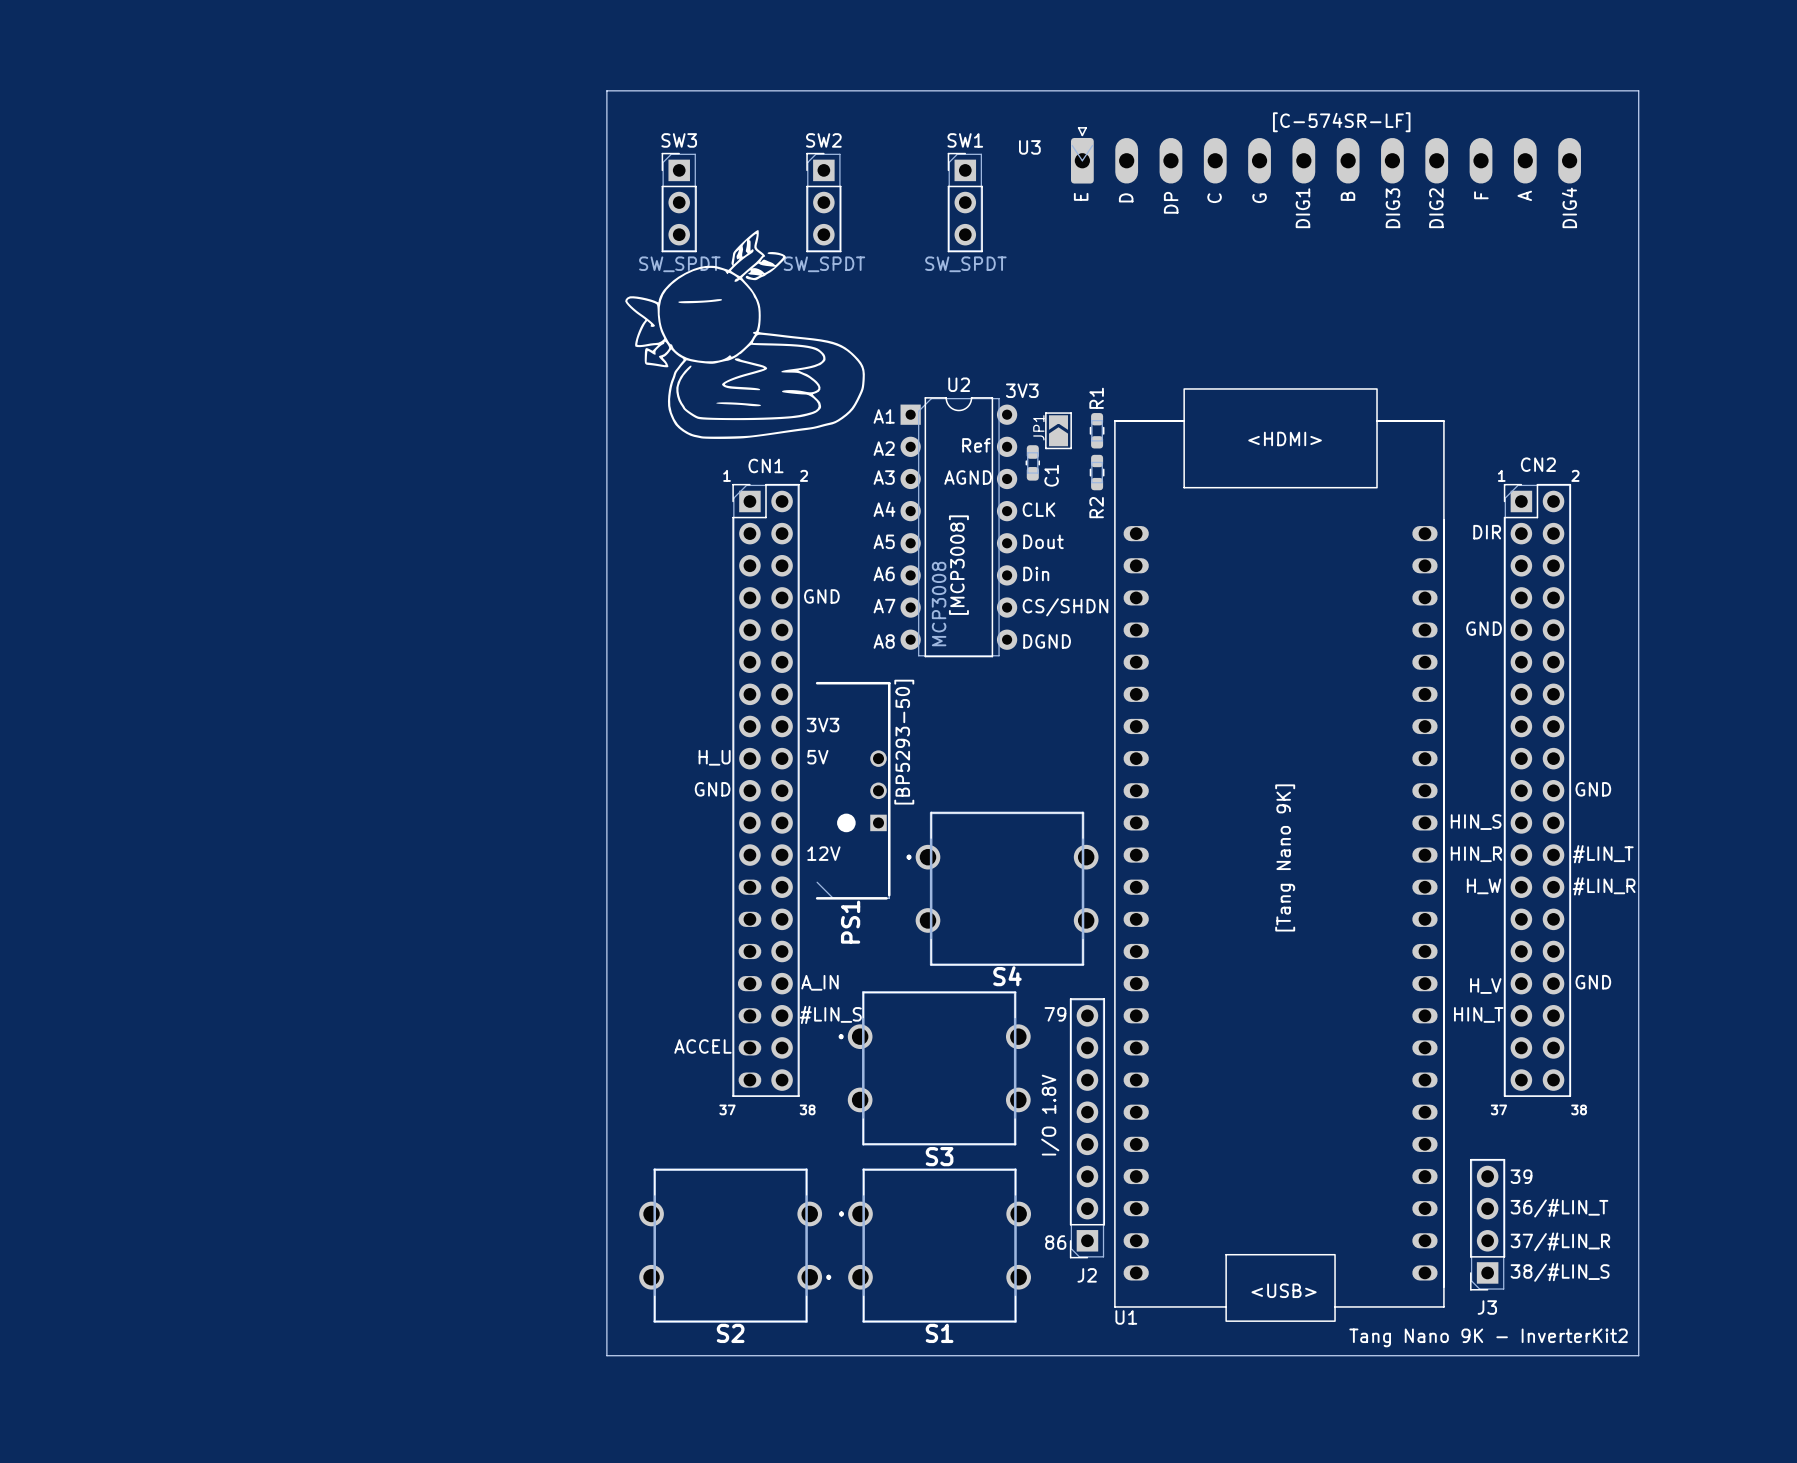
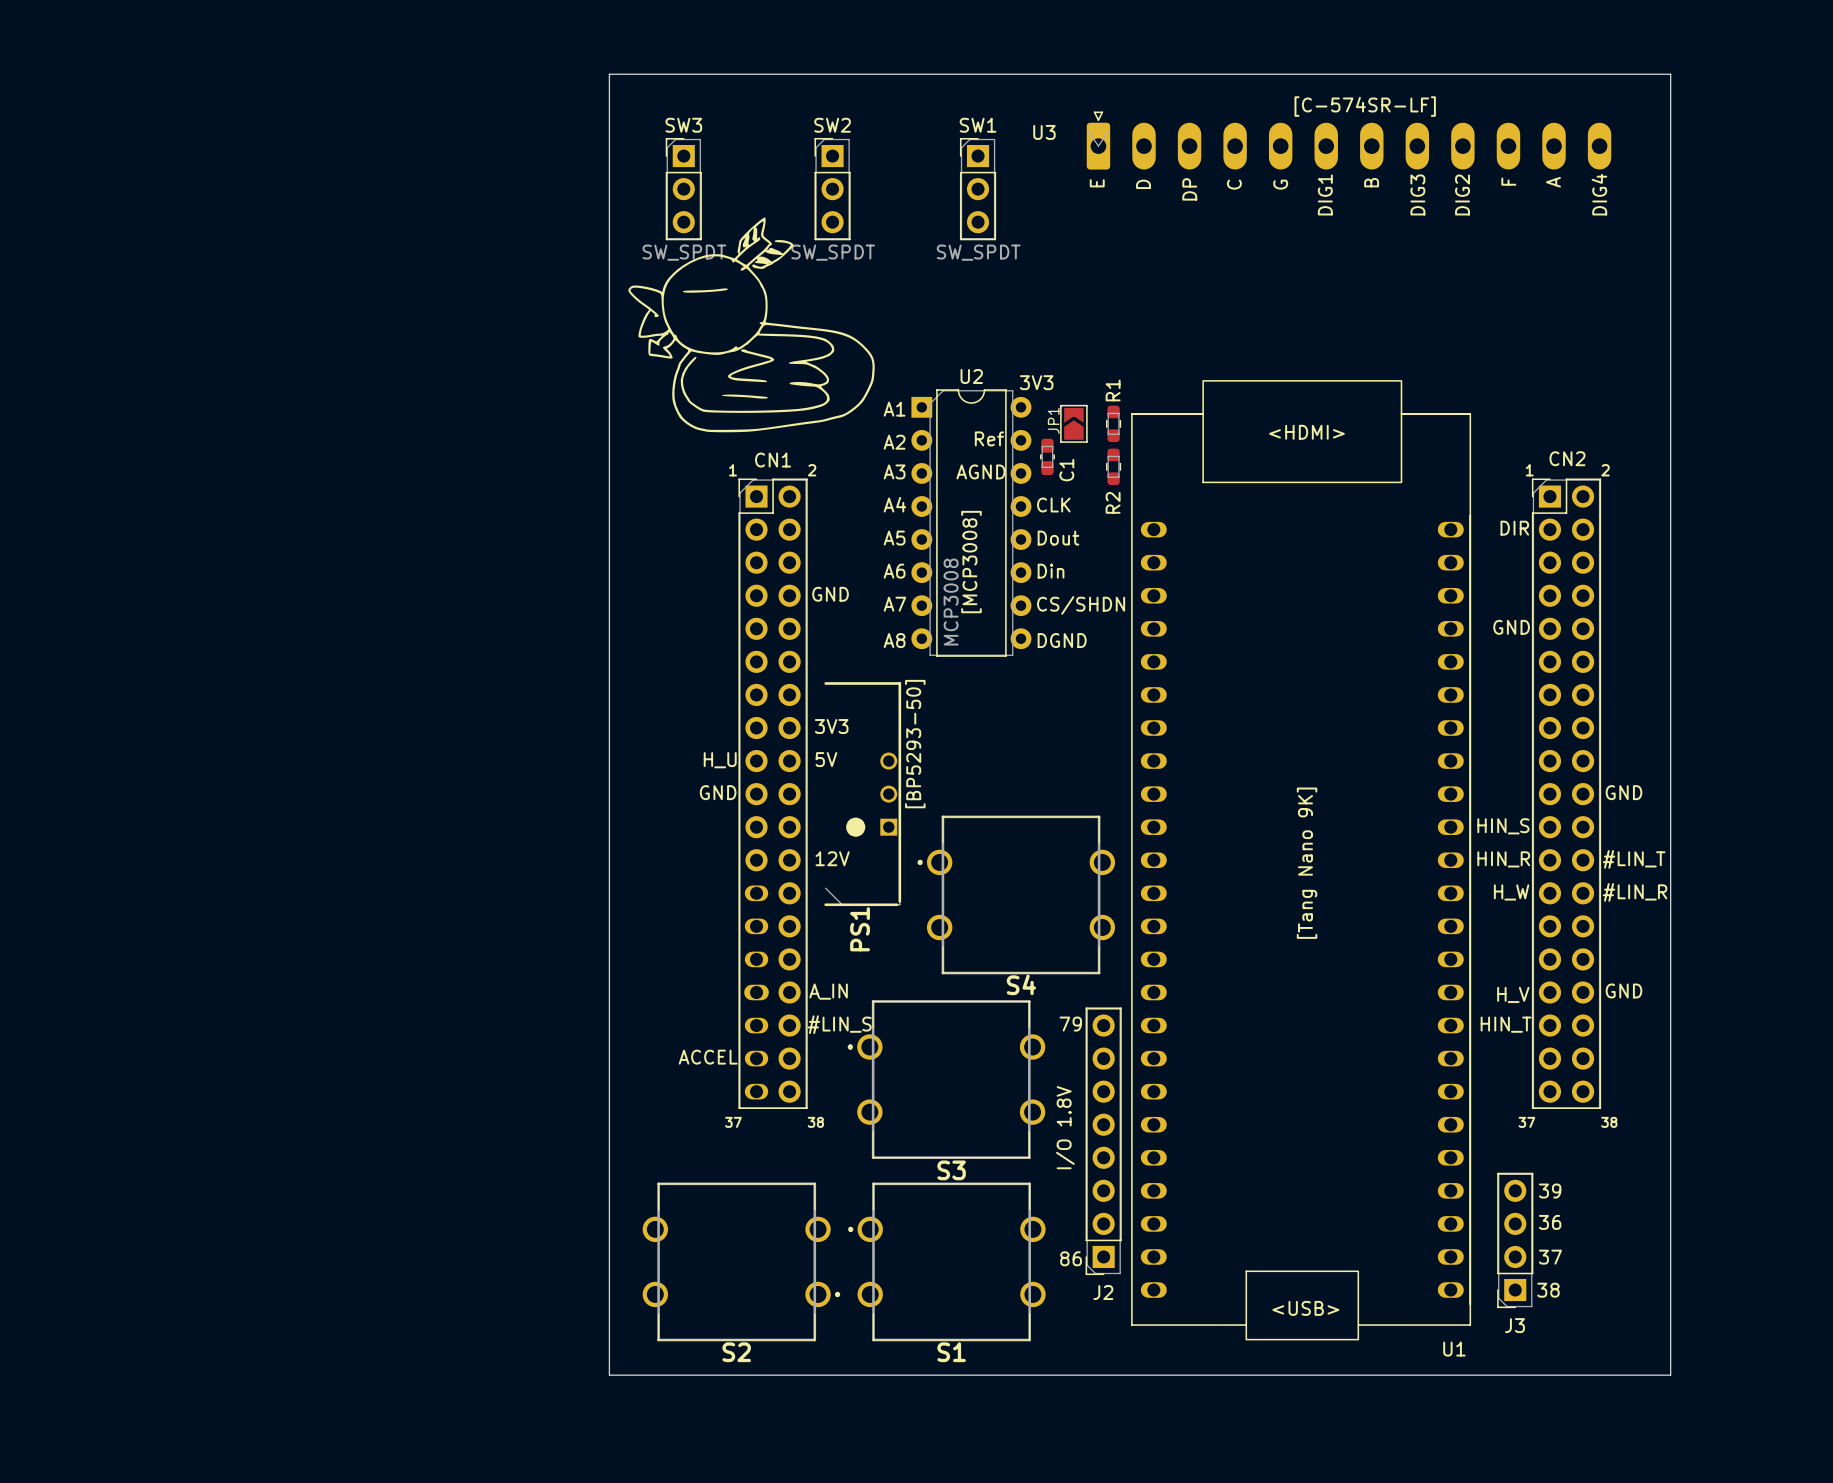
text: 36/#LIN_T (1559, 1208) -> 36 (1550, 1222)
text: 37/#LIN_R (1560, 1241) -> 37 (1550, 1257)
text: 38/#LIN_S (1560, 1272) -> 38 (1548, 1290)
U1 name position: U1 (1126, 1317) -> U1 (1454, 1349)
text: Tang Nano 9K - InverterKit2 (1488, 1337) -> none

